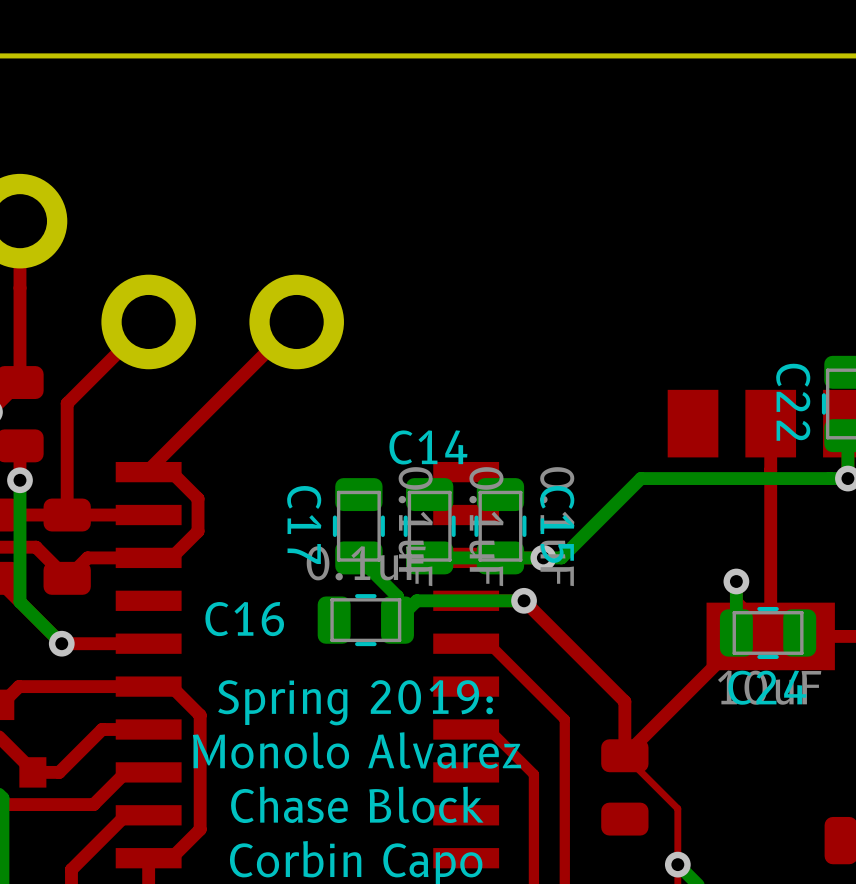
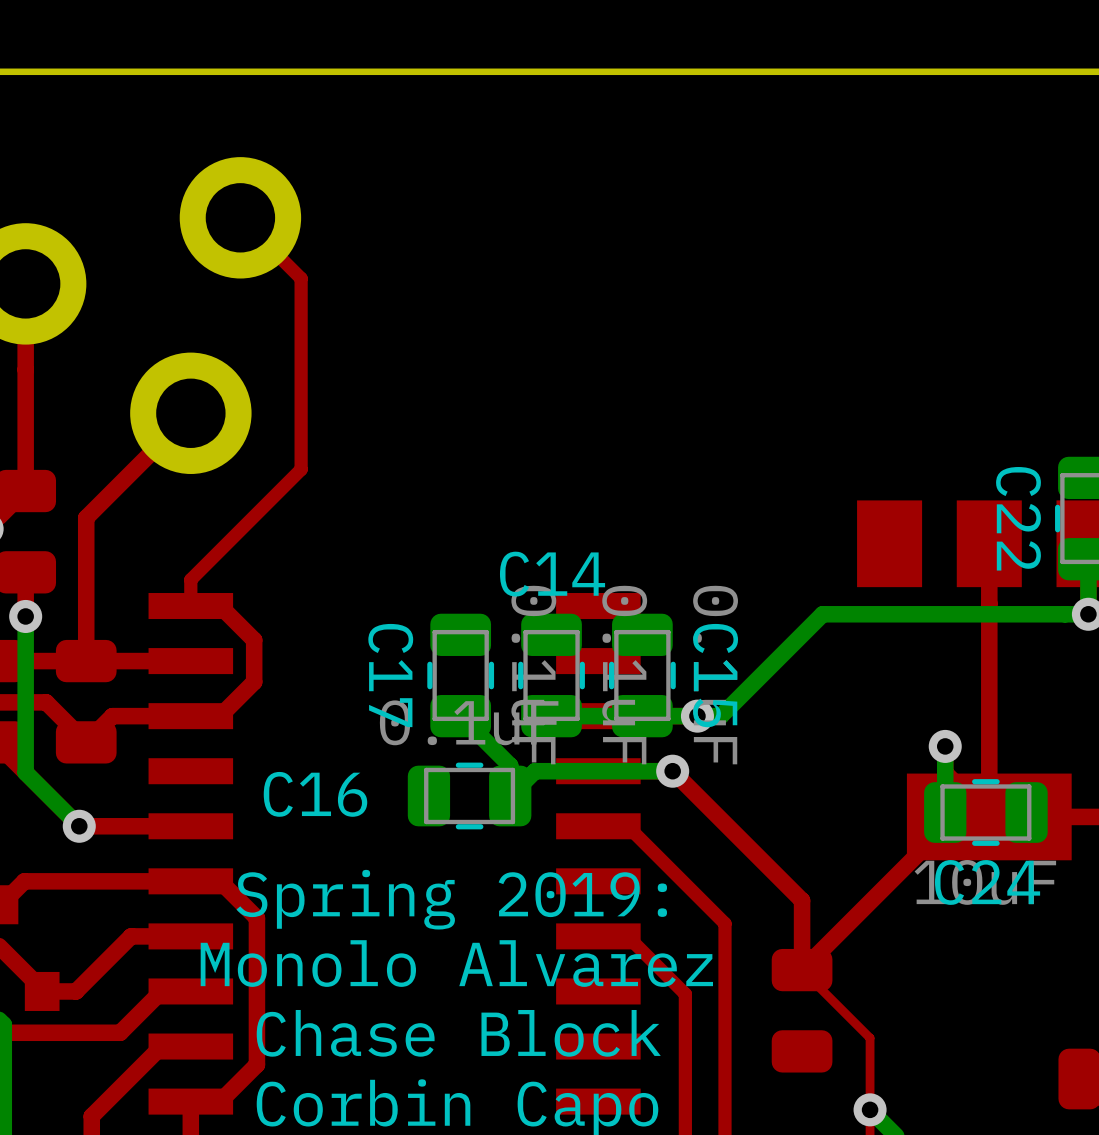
top track: none -> (240, 217) (301, 278) (301, 469) (190, 579) (190, 606)
top track: (296, 321) (148, 470) -> none
part position: (296, 321) -> (240, 217)

